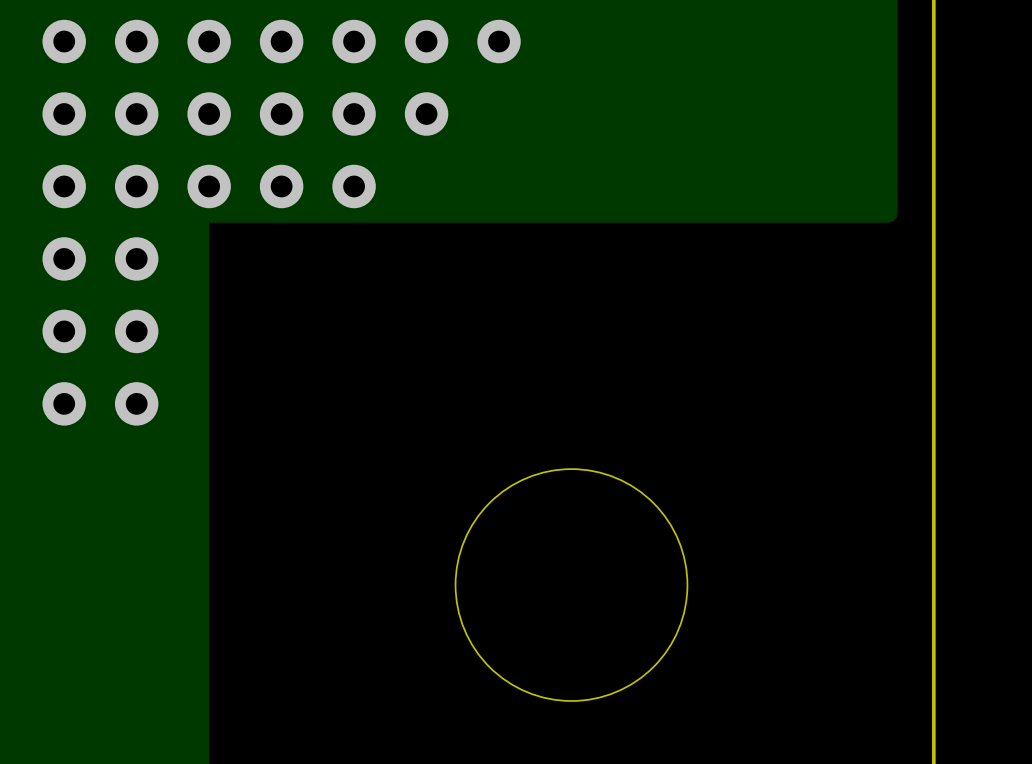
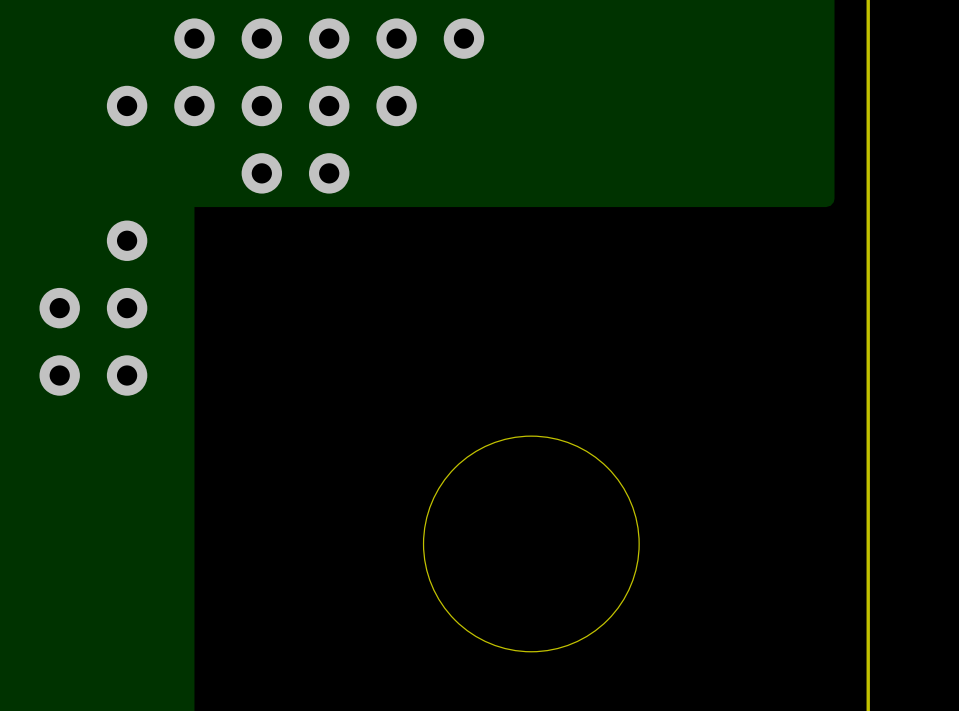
via: (64, 41) -> none
via: (136, 41) -> none
via: (64, 114) -> none
via: (64, 186) -> none
via: (136, 186) -> none
via: (209, 186) -> none
via: (64, 258) -> none

